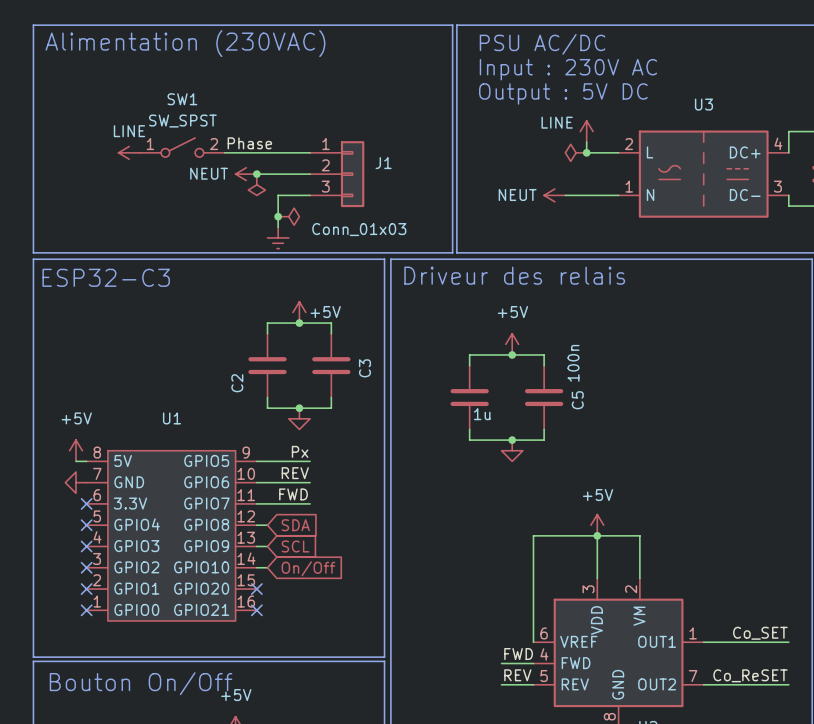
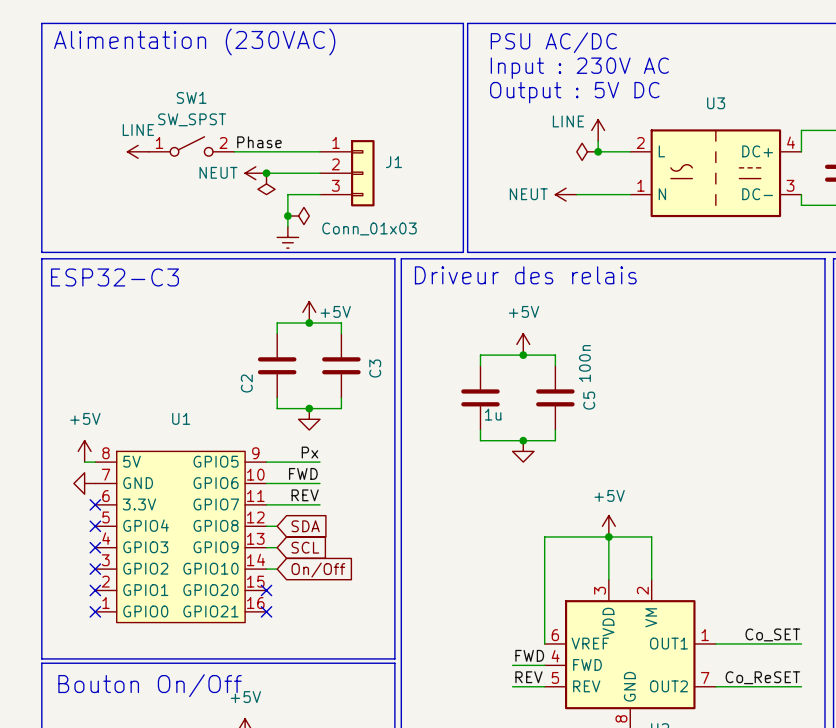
label: REV (295, 473) -> FWD (303, 473)
label: FWD (293, 494) -> REV (305, 495)

